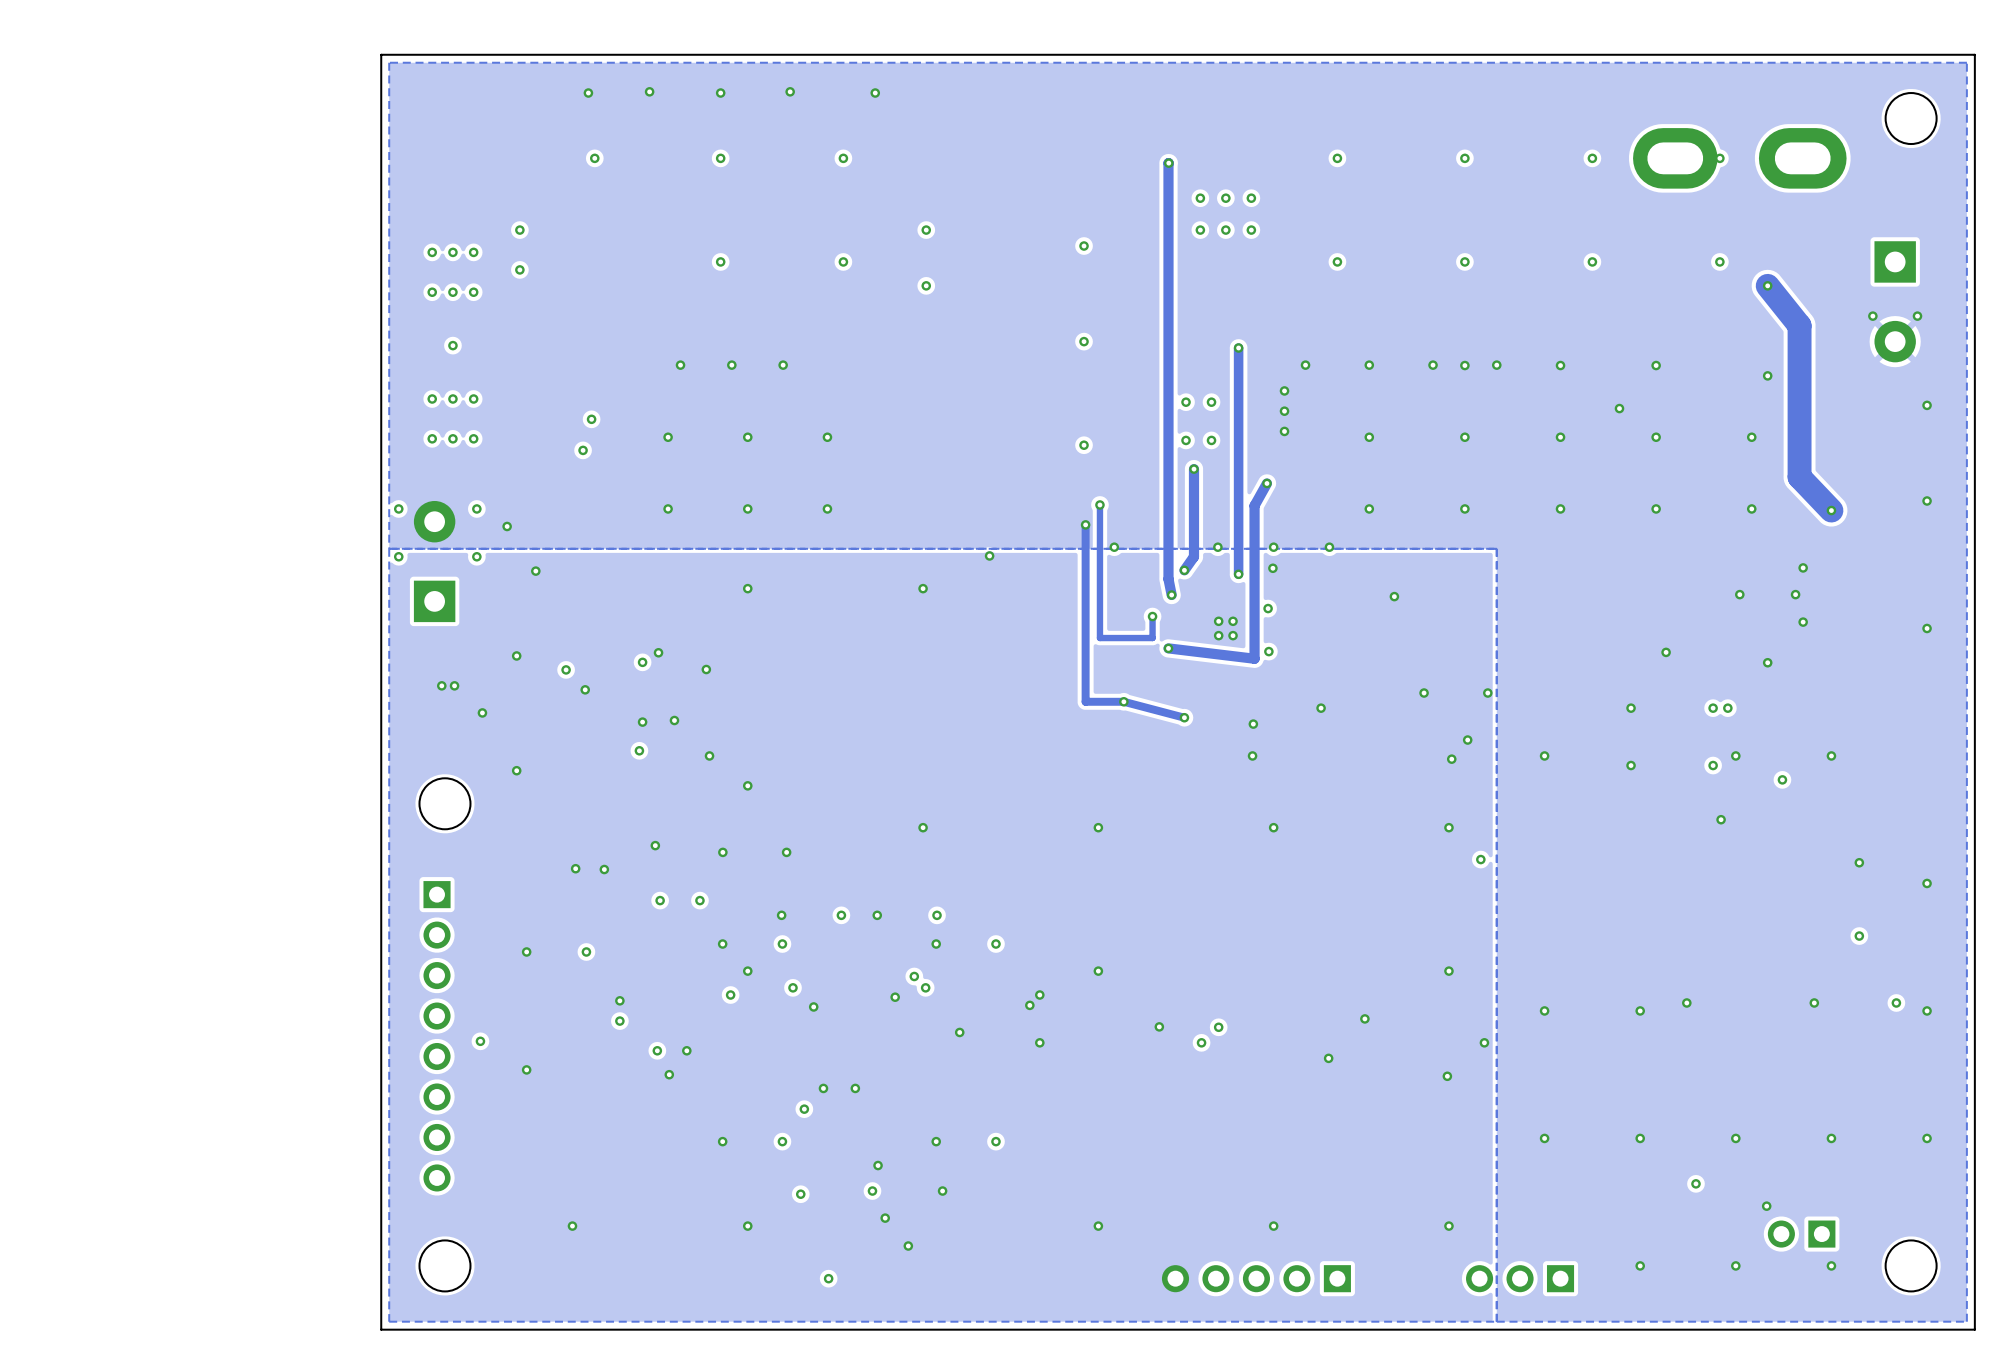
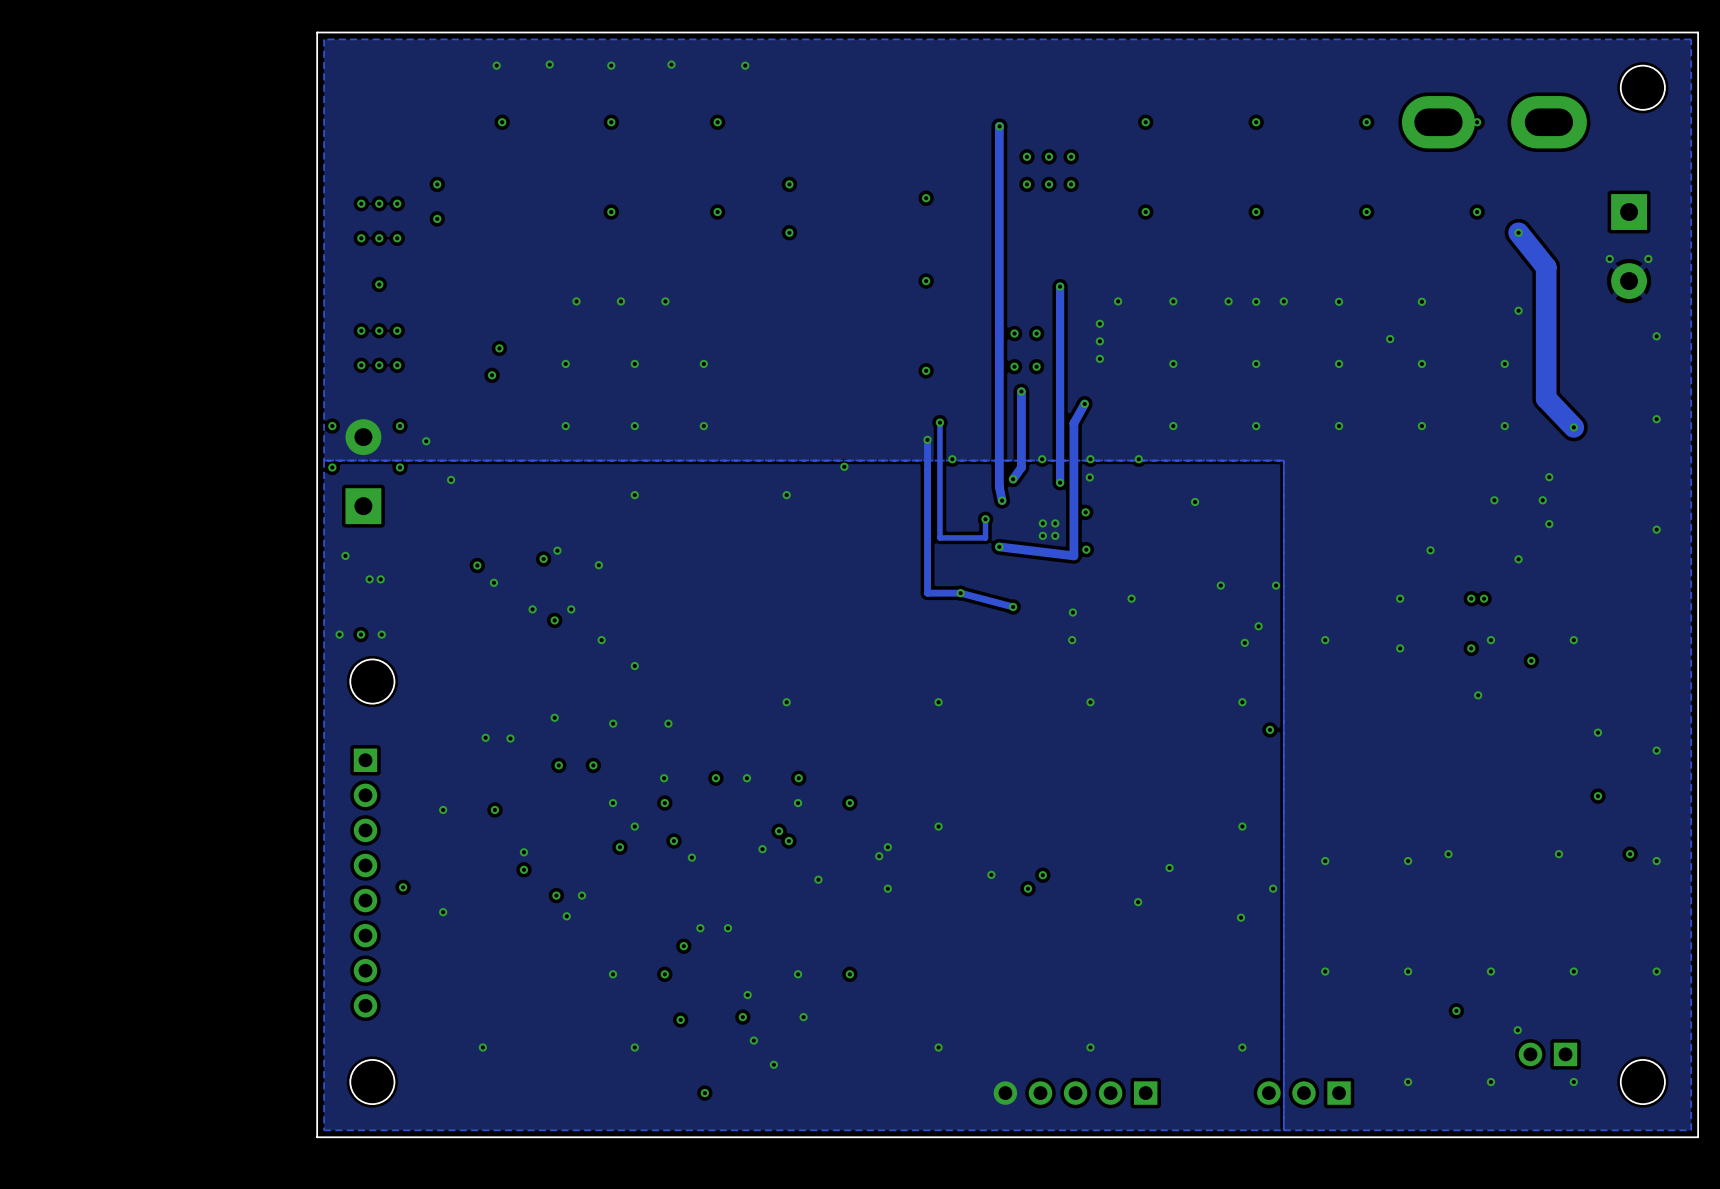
via: (516, 655) -> none
via: none -> (345, 555)
via: (482, 712) -> none
via: none -> (532, 609)
via: (642, 722) -> none
via: none -> (554, 620)
via: none -> (339, 634)
via: none -> (360, 634)
via: none -> (381, 634)
via: (639, 750) -> none
via: (516, 770) -> none

